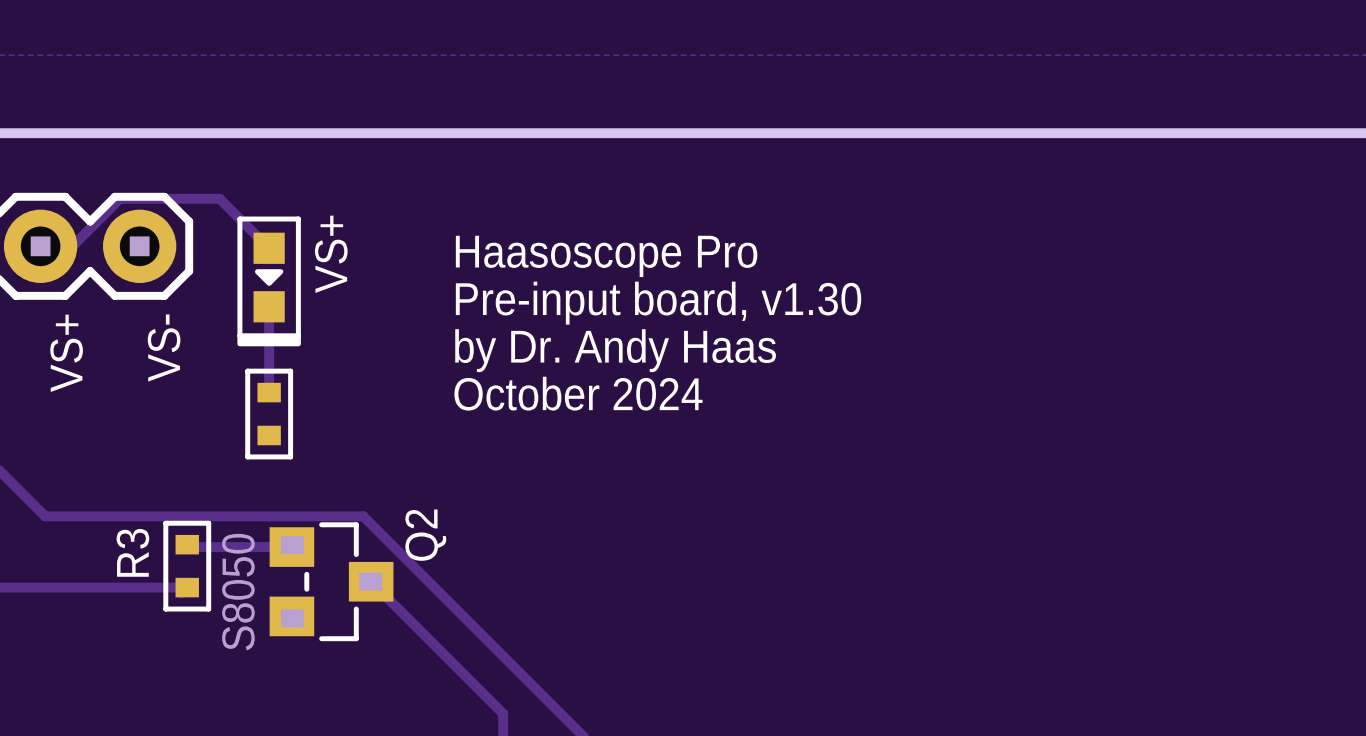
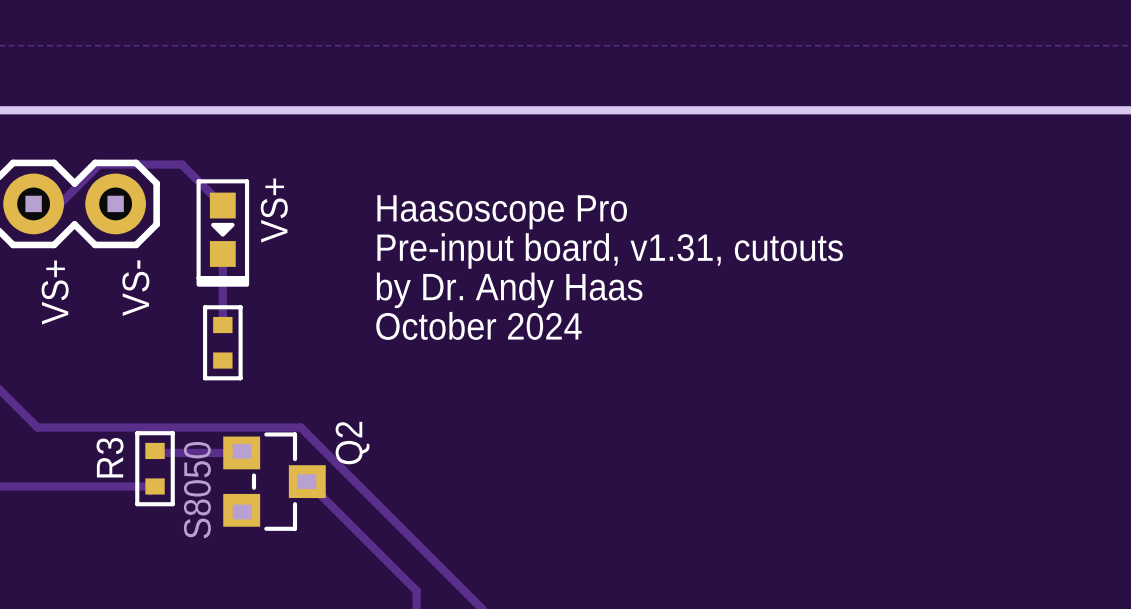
text: Pre-input board, v1.30 (658, 303) -> Pre-input board, v1.31, cutouts (610, 250)

